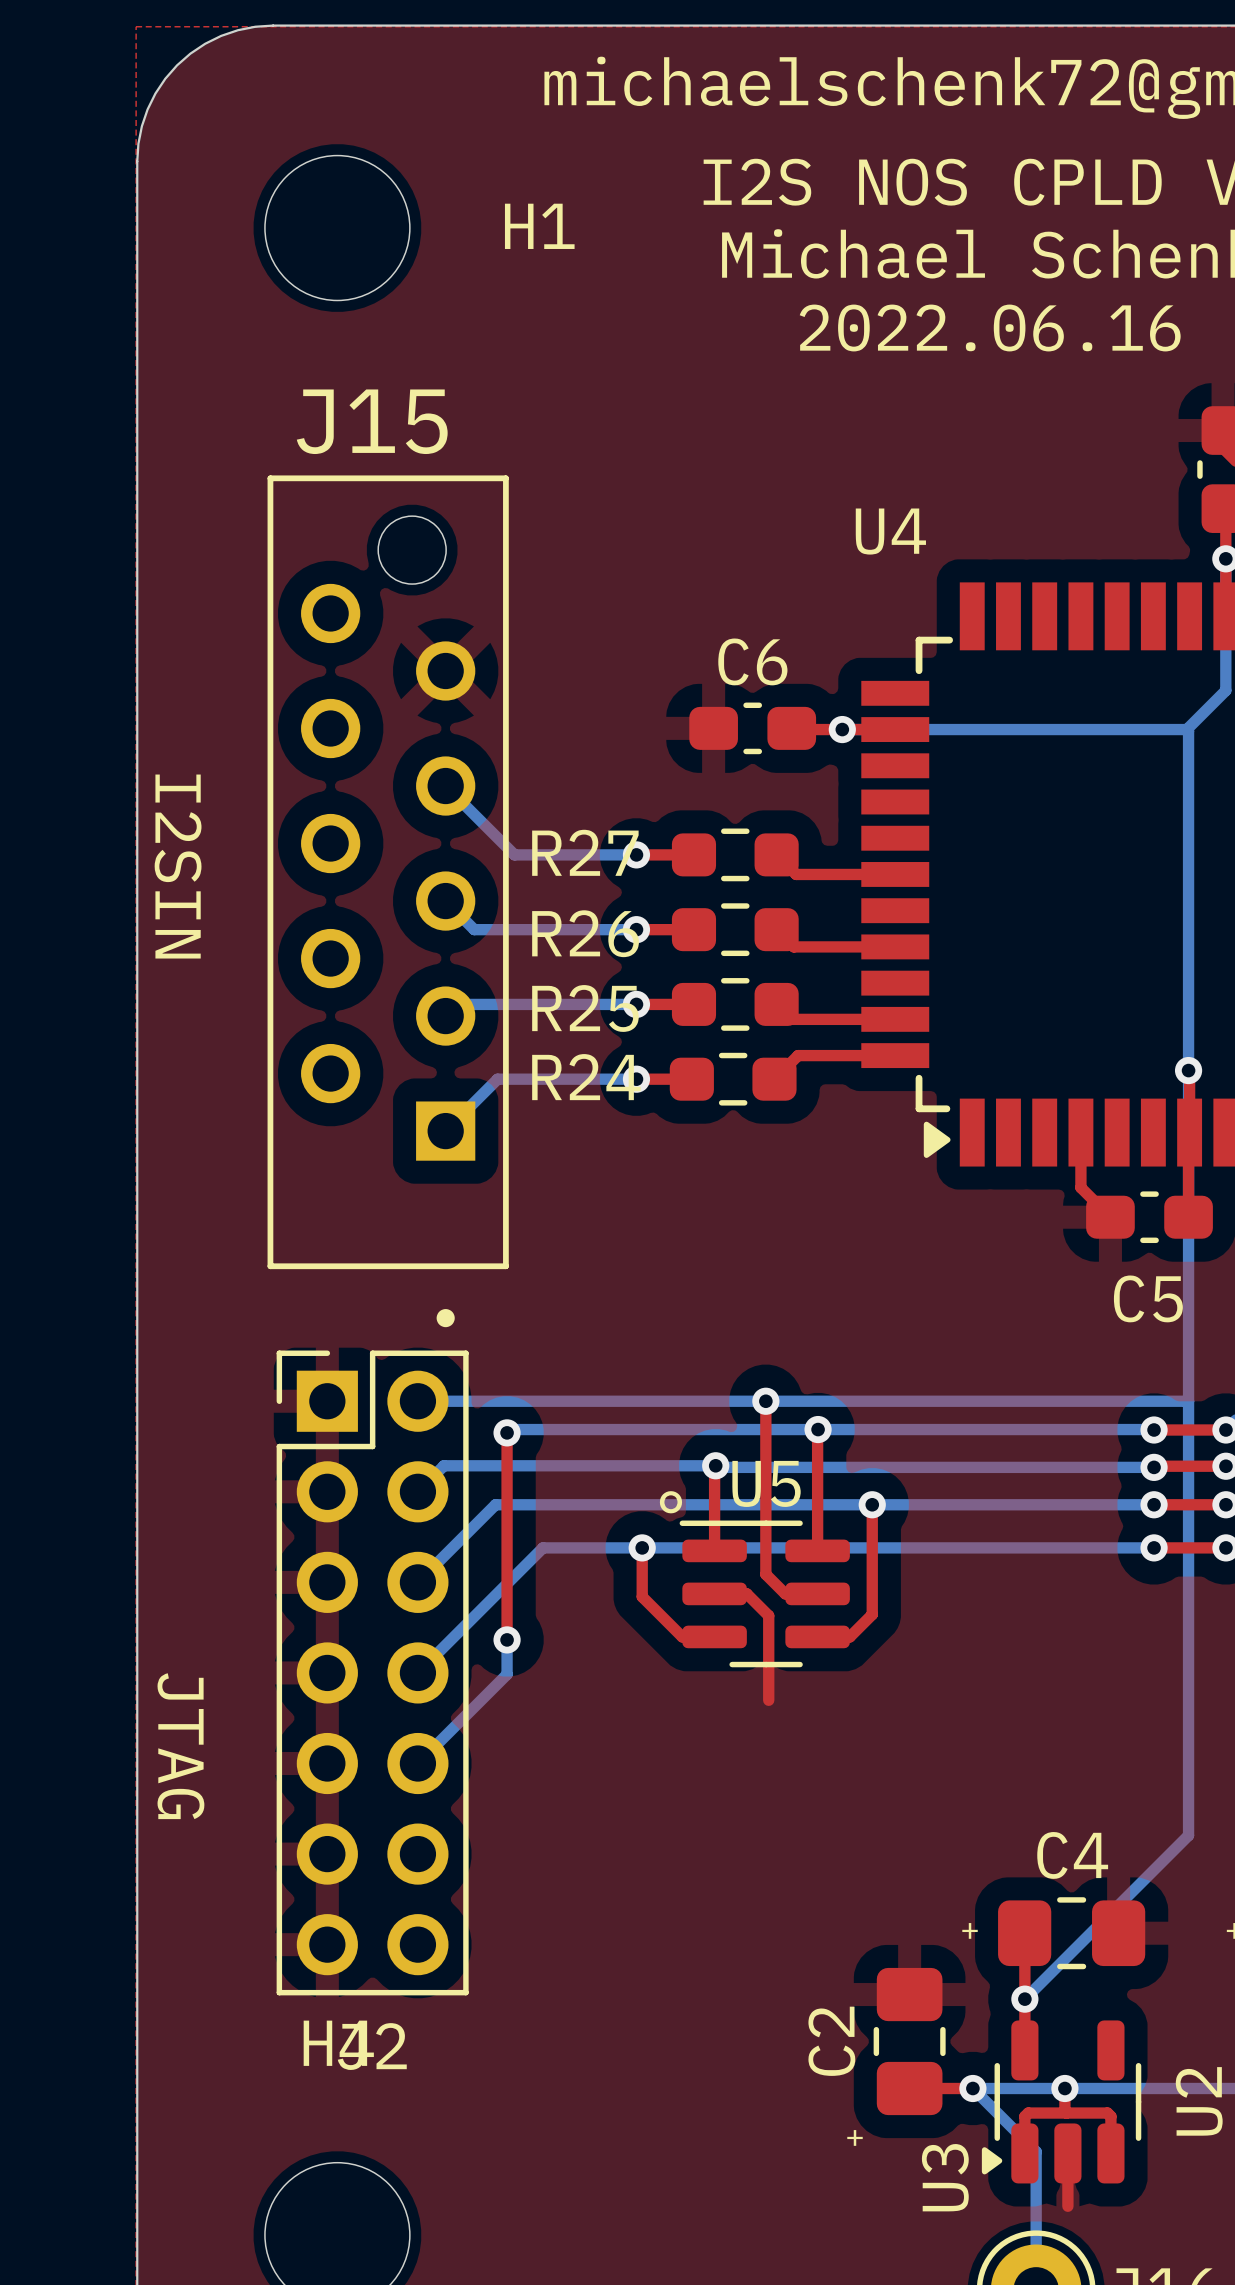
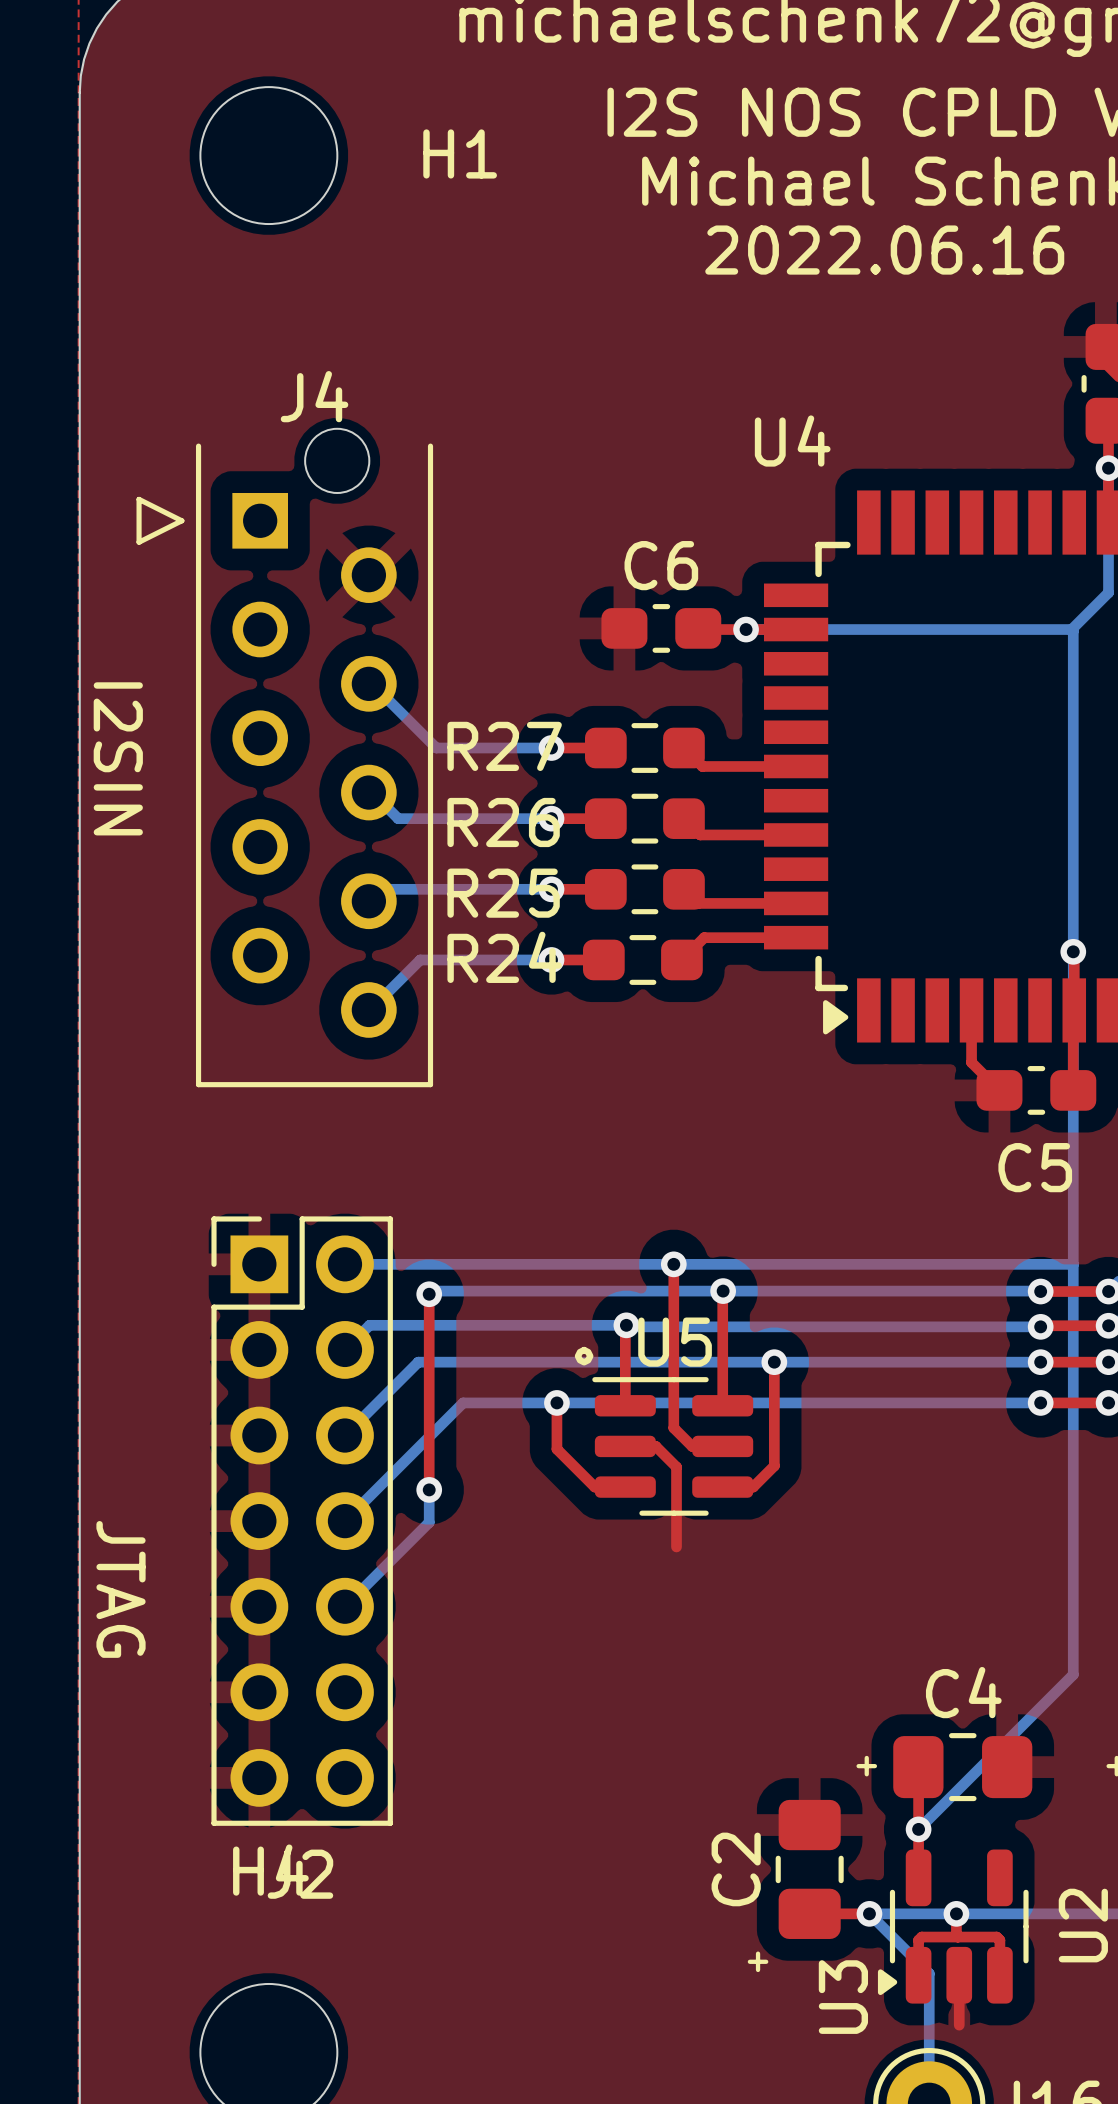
J4: none -> (284, 758)
J15: (388, 901) -> none

